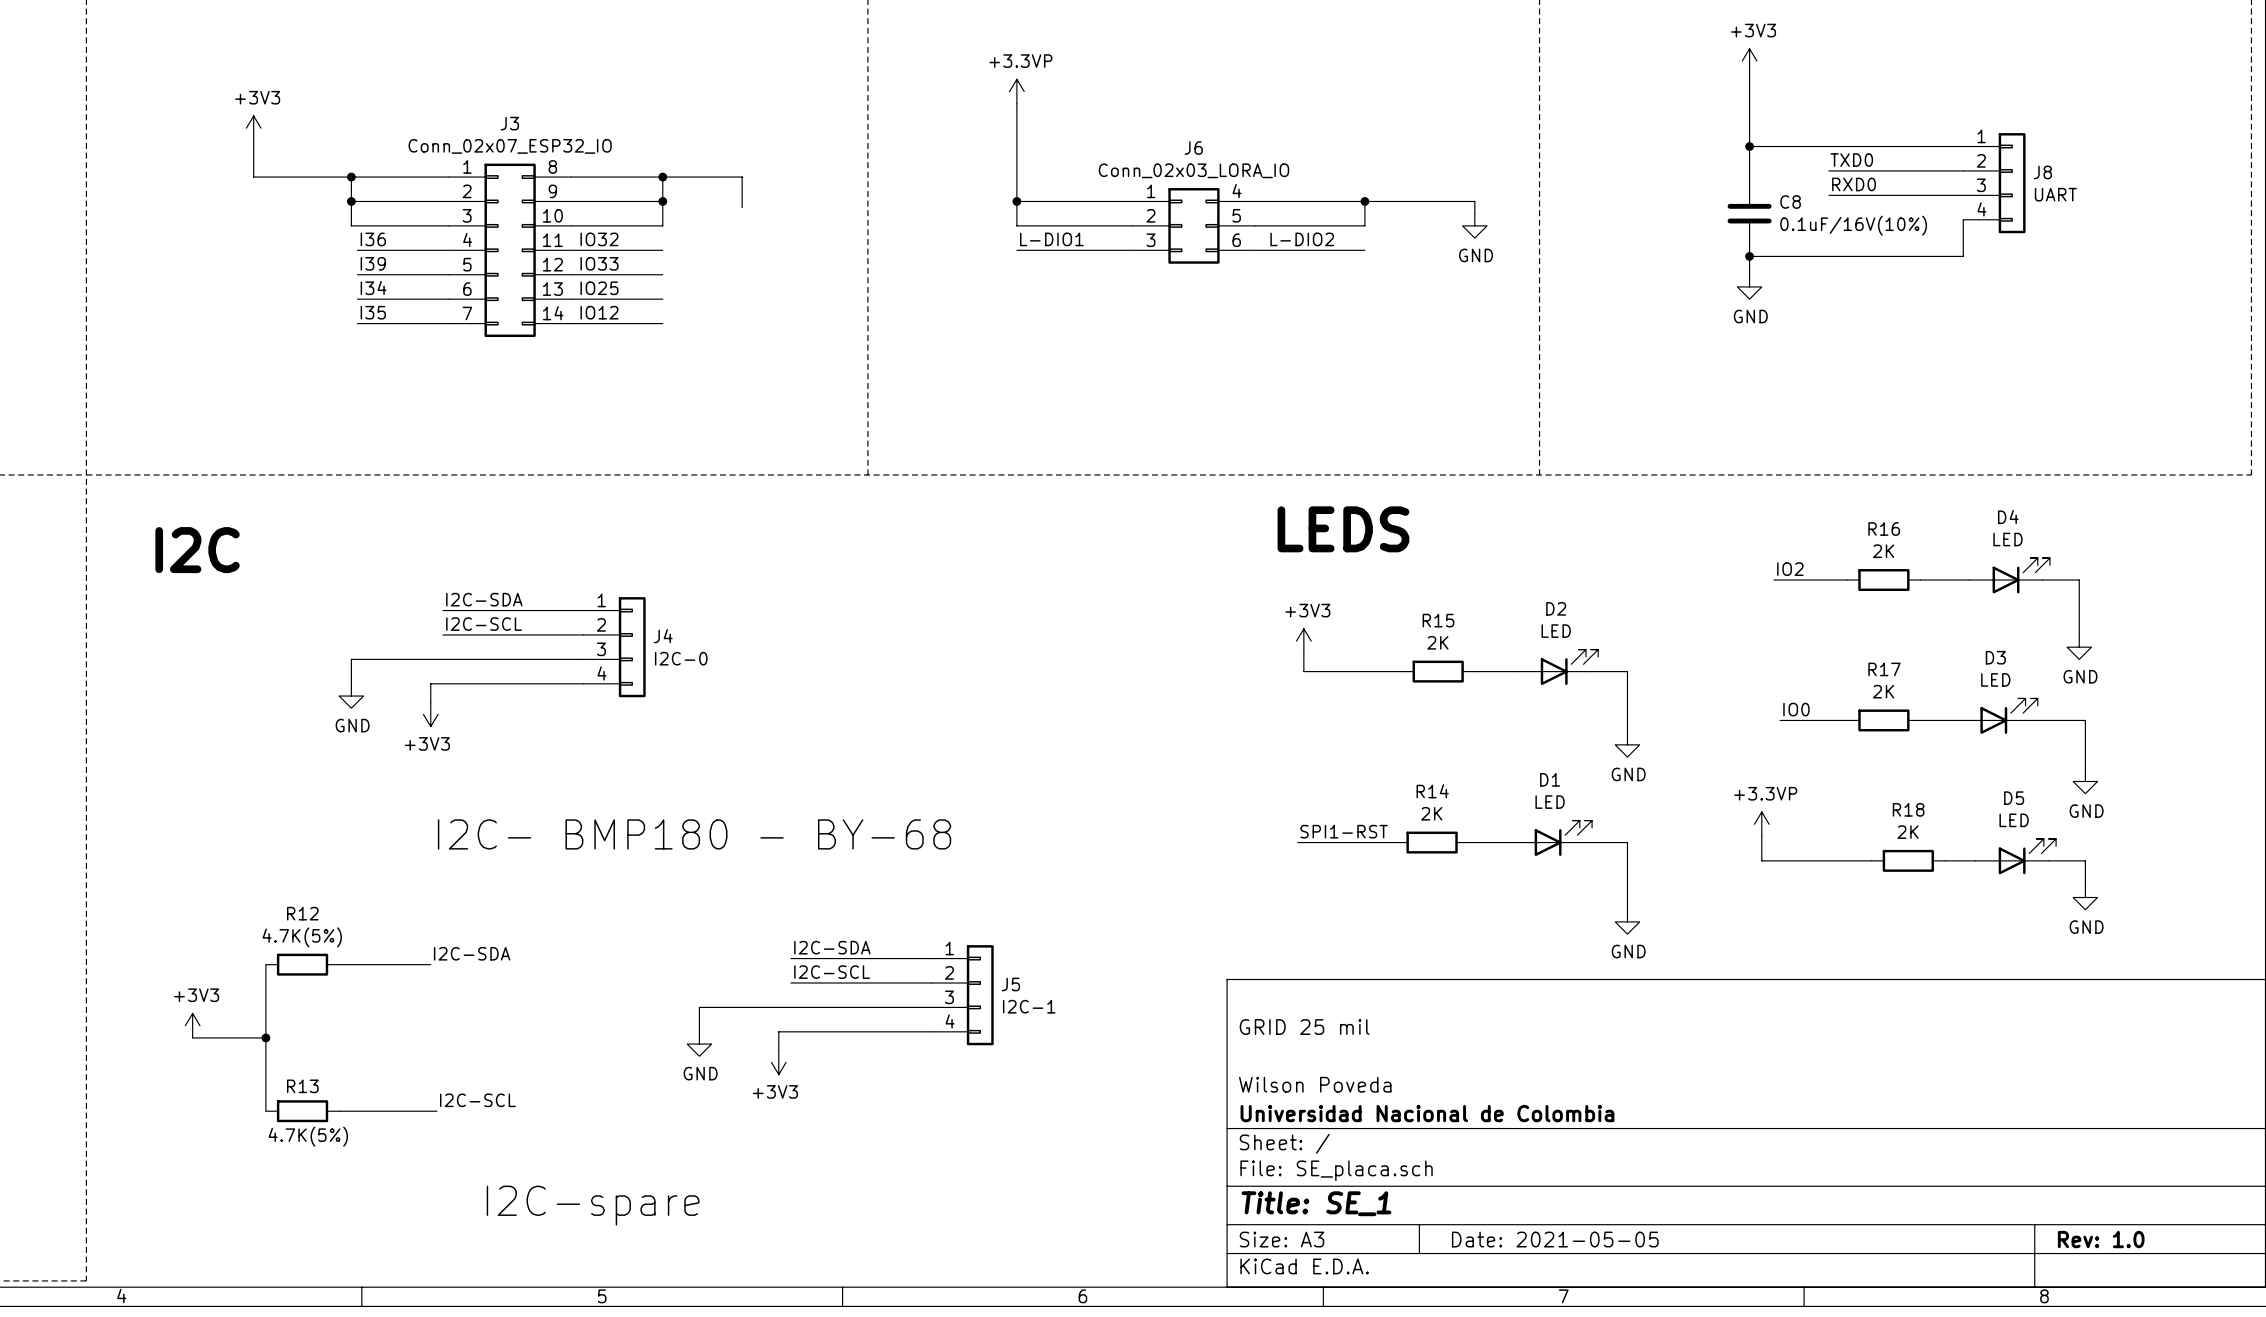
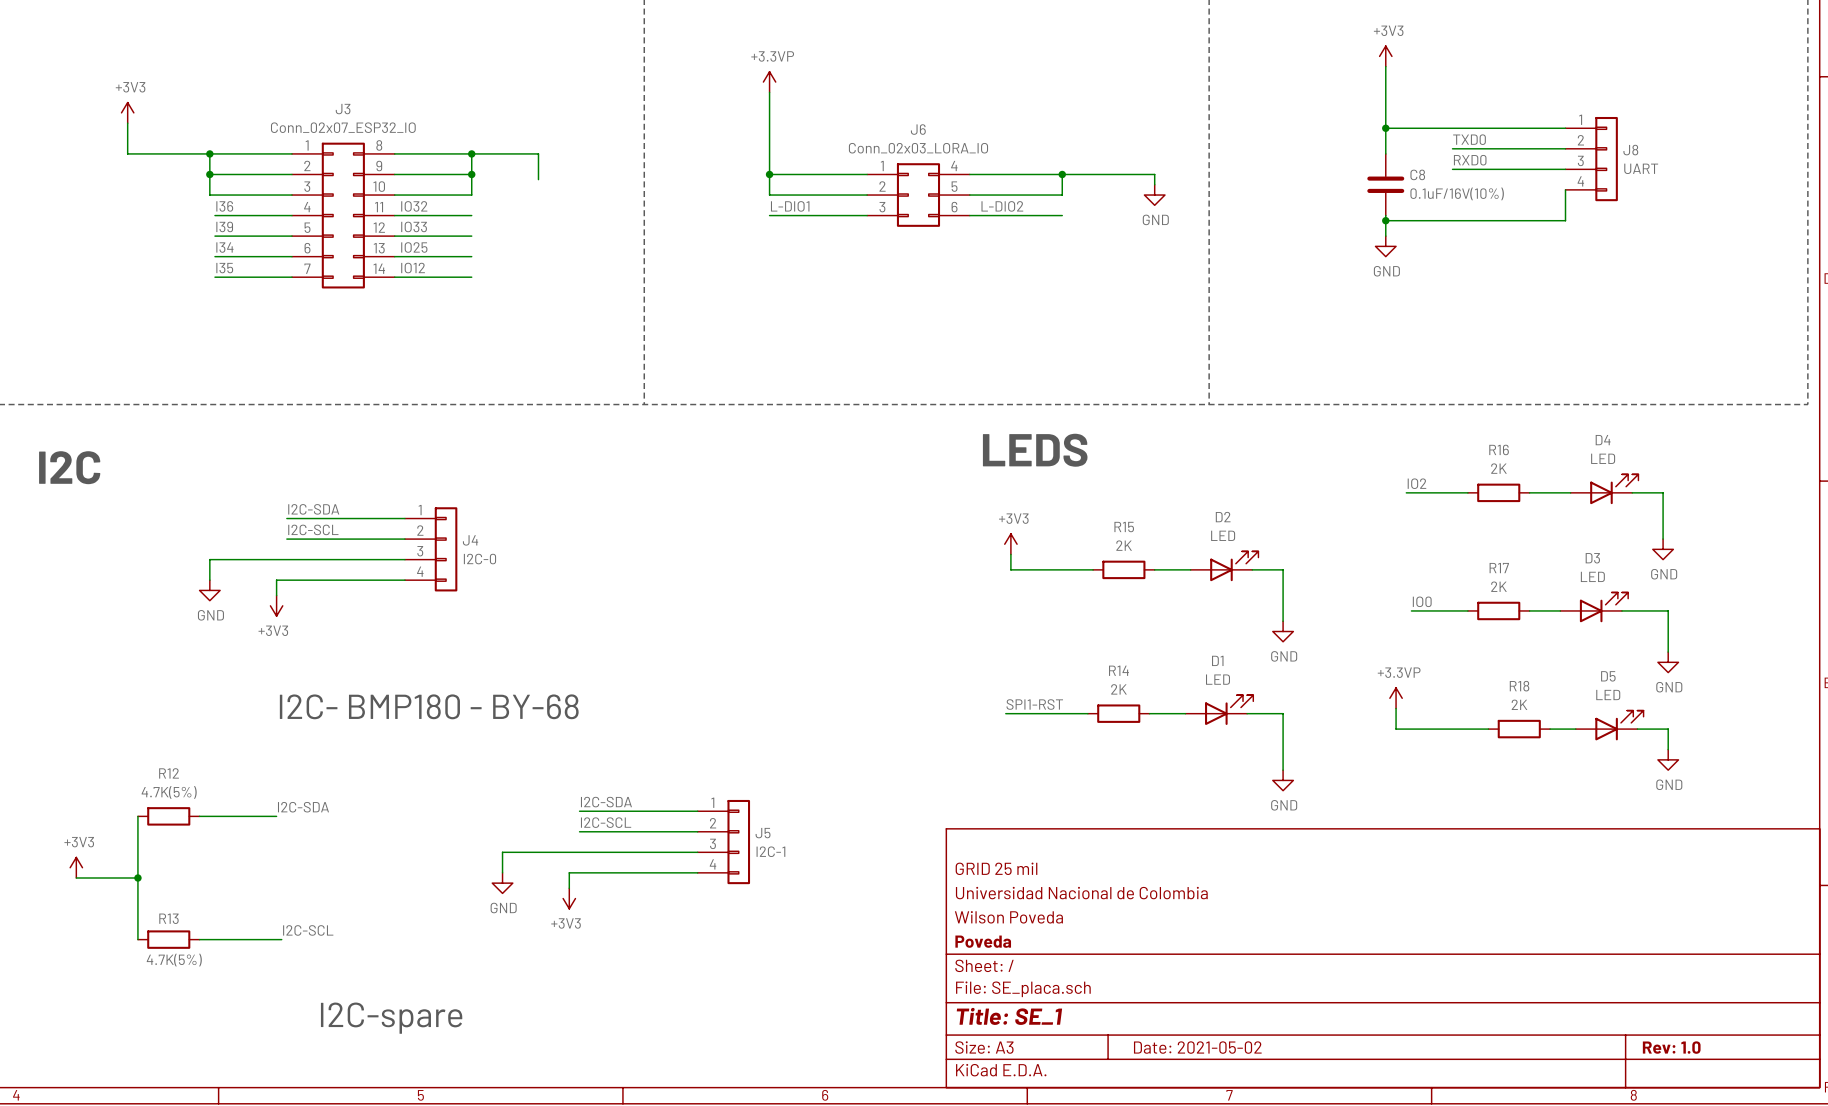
title block: none -> Universidad Nacional de Colombia (1081, 893)
title block: Universidad Nacional de Colombia (1427, 1113) -> Poveda (983, 941)
title block: Date: 2021-05-05 (1555, 1239) -> Date: 2021-05-02 (1197, 1047)

